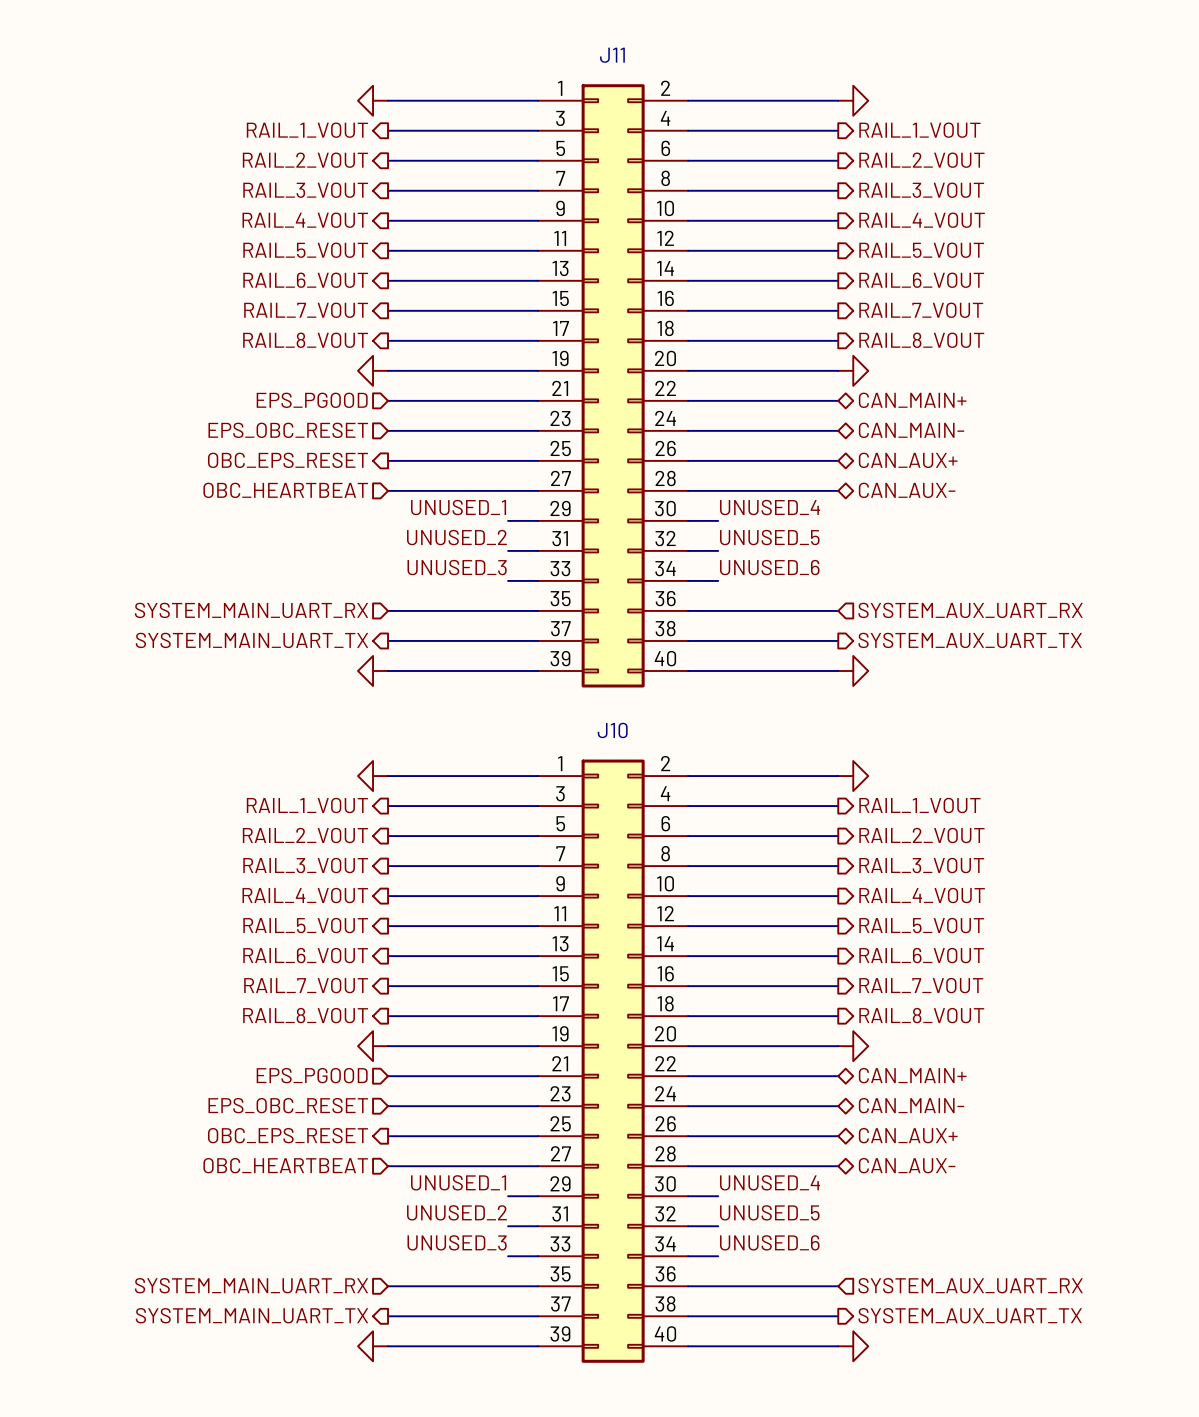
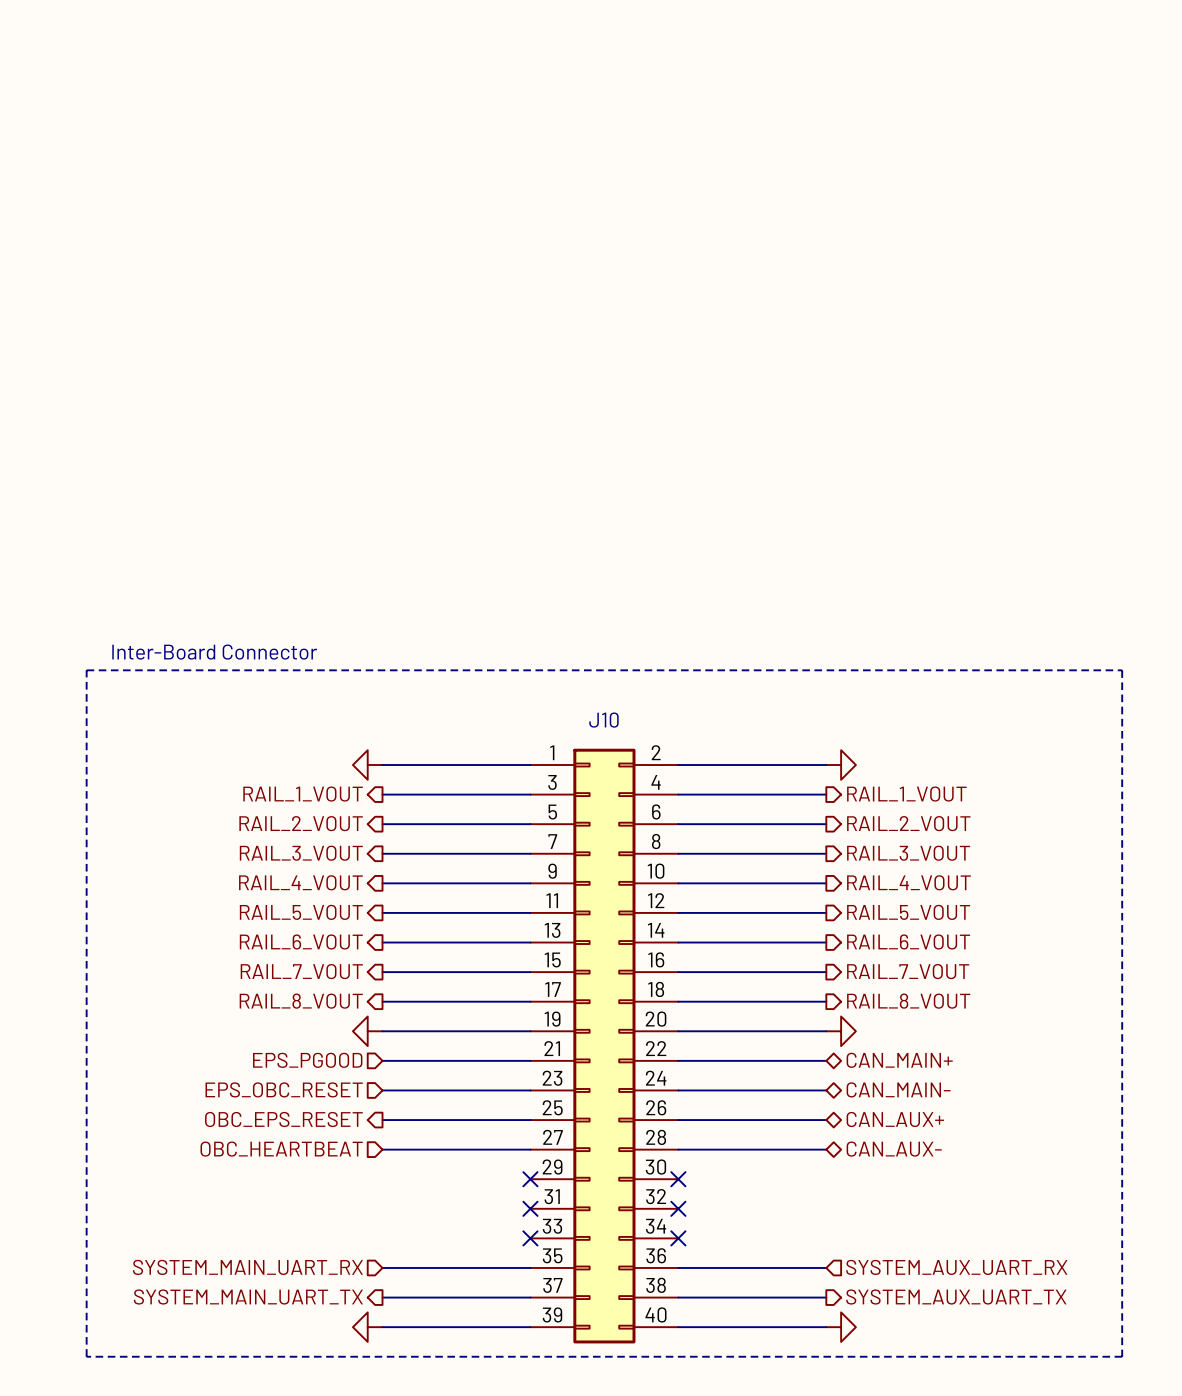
power symbol: (373, 100) -> none
wire: (388, 100) (538, 100) -> none
wire: (688, 100) (838, 100) -> none
power symbol: (853, 100) -> none
hierarchical label: RAIL_1_VOUT (307, 130) -> none
wire: (388, 130) (538, 130) -> none
wire: (688, 130) (838, 130) -> none
hierarchical label: RAIL_1_VOUT (919, 130) -> none
hierarchical label: RAIL_2_VOUT (305, 160) -> none
wire: (388, 160) (538, 160) -> none
wire: (688, 160) (838, 160) -> none
hierarchical label: RAIL_2_VOUT (921, 160) -> none
hierarchical label: RAIL_3_VOUT (305, 190) -> none
wire: (388, 190) (538, 190) -> none
wire: (688, 190) (838, 190) -> none
hierarchical label: RAIL_3_VOUT (921, 190) -> none
hierarchical label: RAIL_4_VOUT (305, 220) -> none
wire: (388, 220) (538, 220) -> none
wire: (688, 220) (838, 220) -> none
hierarchical label: RAIL_4_VOUT (922, 220) -> none
hierarchical label: RAIL_5_VOUT (305, 250) -> none
wire: (388, 250) (538, 250) -> none
wire: (688, 250) (838, 250) -> none
hierarchical label: RAIL_5_VOUT (921, 250) -> none
hierarchical label: RAIL_6_VOUT (305, 280) -> none
wire: (388, 280) (538, 280) -> none
wire: (688, 280) (838, 280) -> none
hierarchical label: RAIL_6_VOUT (921, 280) -> none
hierarchical label: RAIL_7_VOUT (306, 310) -> none
wire: (388, 310) (538, 310) -> none
wire: (688, 310) (838, 310) -> none
hierarchical label: RAIL_7_VOUT (921, 310) -> none
hierarchical label: RAIL_8_VOUT (305, 340) -> none
wire: (388, 340) (538, 340) -> none
wire: (688, 340) (838, 340) -> none
hierarchical label: RAIL_8_VOUT (921, 340) -> none
power symbol: (373, 370) -> none
wire: (388, 370) (538, 370) -> none
wire: (688, 370) (838, 370) -> none
power symbol: (853, 370) -> none
J11: (613, 385) -> none
hierarchical label: EPS_PGOOD (312, 400) -> none
wire: (388, 400) (538, 400) -> none
wire: (688, 400) (838, 400) -> none
hierarchical label: CAN_MAIN+ (912, 400) -> none
hierarchical label: EPS_OBC_RESET (288, 430) -> none
wire: (388, 430) (538, 430) -> none
wire: (688, 430) (838, 430) -> none
hierarchical label: CAN_MAIN- (911, 430) -> none
hierarchical label: OBC_EPS_RESET (288, 460) -> none
wire: (388, 460) (538, 460) -> none
wire: (688, 460) (838, 460) -> none
hierarchical label: CAN_AUX+ (908, 460) -> none
hierarchical label: OBC_HEARTBEAT (285, 490) -> none
wire: (388, 490) (538, 490) -> none
wire: (688, 490) (838, 490) -> none
hierarchical label: CAN_AUX- (907, 490) -> none
label: UNUSED_1 (458, 507) -> none
label: UNUSED_4 (770, 507) -> none
wire: (508, 520) (538, 520) -> none
wire: (688, 520) (718, 520) -> none
label: UNUSED_2 (456, 537) -> none
label: UNUSED_5 (769, 537) -> none
wire: (508, 550) (538, 550) -> none
wire: (688, 550) (718, 550) -> none
label: UNUSED_3 (457, 567) -> none
label: UNUSED_6 (769, 567) -> none
wire: (508, 580) (538, 580) -> none
wire: (688, 580) (718, 580) -> none
hierarchical label: SYSTEM_MAIN_UART_RX (251, 610) -> none
wire: (388, 610) (538, 610) -> none
wire: (688, 610) (838, 610) -> none
hierarchical label: SYSTEM_AUX_UART_RX (970, 610) -> none
hierarchical label: SYSTEM_MAIN_UART_TX (251, 640) -> none
wire: (388, 640) (538, 640) -> none
wire: (688, 640) (838, 640) -> none
hierarchical label: SYSTEM_AUX_UART_TX (970, 640) -> none
text: none -> Inter-Board Connector (214, 652)
power symbol: (373, 670) -> none
wire: (388, 670) (538, 670) -> none
wire: (688, 670) (838, 670) -> none
power symbol: (853, 670) -> none
line: none -> (86, 670) (1122, 670) (1122, 1356) (86, 1356) (86, 670)
label: UNUSED_1 (458, 1182) -> none
label: UNUSED_4 (770, 1182) -> none
wire: (508, 1196) (538, 1196) -> none
no-connect mark: none -> (530, 1179)
wire: (688, 1196) (718, 1196) -> none
no-connect mark: none -> (678, 1179)
label: UNUSED_2 (456, 1212) -> none
label: UNUSED_5 (769, 1212) -> none
wire: (508, 1226) (538, 1226) -> none
no-connect mark: none -> (530, 1208)
wire: (688, 1226) (718, 1226) -> none
no-connect mark: none -> (678, 1208)
label: UNUSED_3 (457, 1242) -> none
label: UNUSED_6 (769, 1242) -> none
wire: (508, 1256) (538, 1256) -> none
no-connect mark: none -> (530, 1238)
wire: (688, 1256) (718, 1256) -> none
no-connect mark: none -> (678, 1238)

